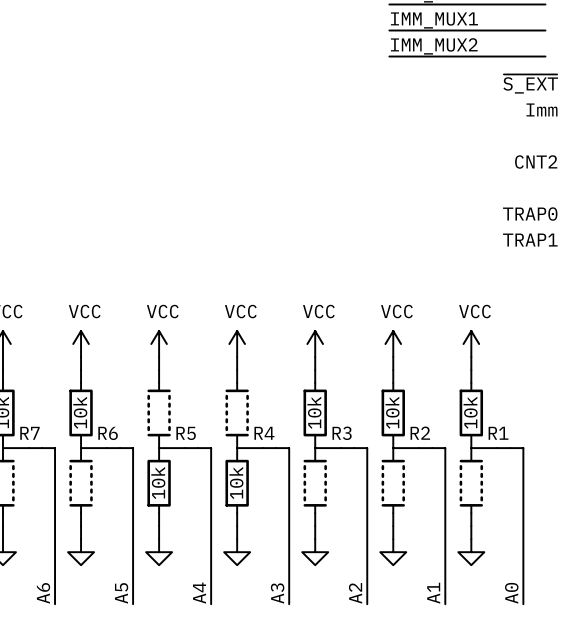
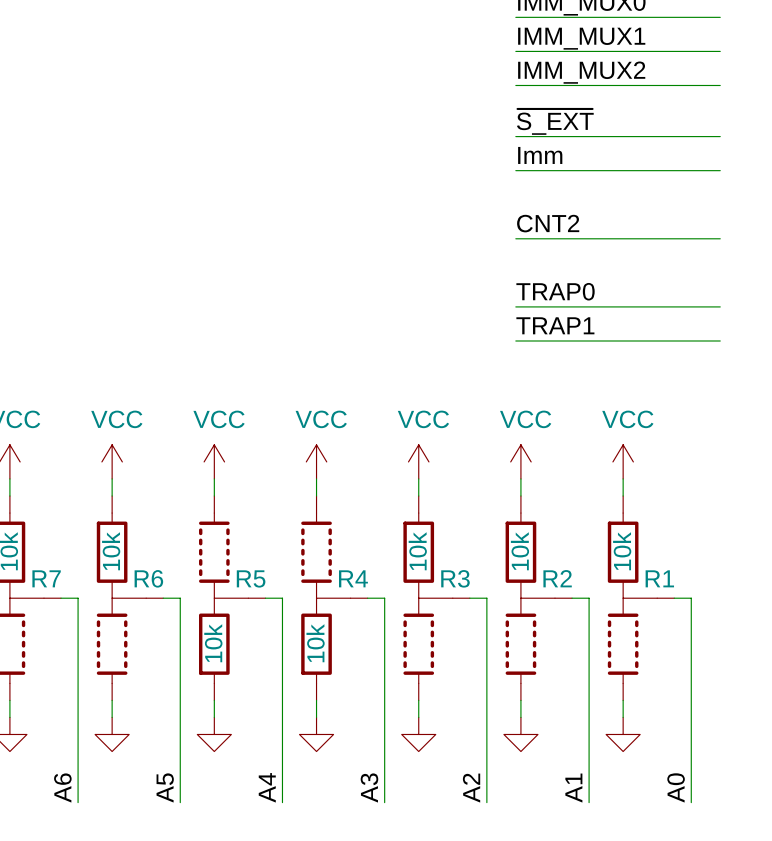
label position: ~{S_EXT} (530, 84) -> ~{S_EXT} (555, 121)
wire: none -> (515, 136) (720, 136)
label position: Imm (541, 109) -> Imm (540, 155)
wire: none -> (515, 170) (720, 170)
label position: CNT2 (536, 162) -> CNT2 (548, 223)
wire: none -> (515, 238) (720, 238)
label position: TRAP0 (530, 214) -> TRAP0 (555, 291)
wire: none -> (515, 306) (720, 306)
label position: TRAP1 (530, 240) -> TRAP1 (555, 325)
wire: none -> (515, 340) (720, 340)

